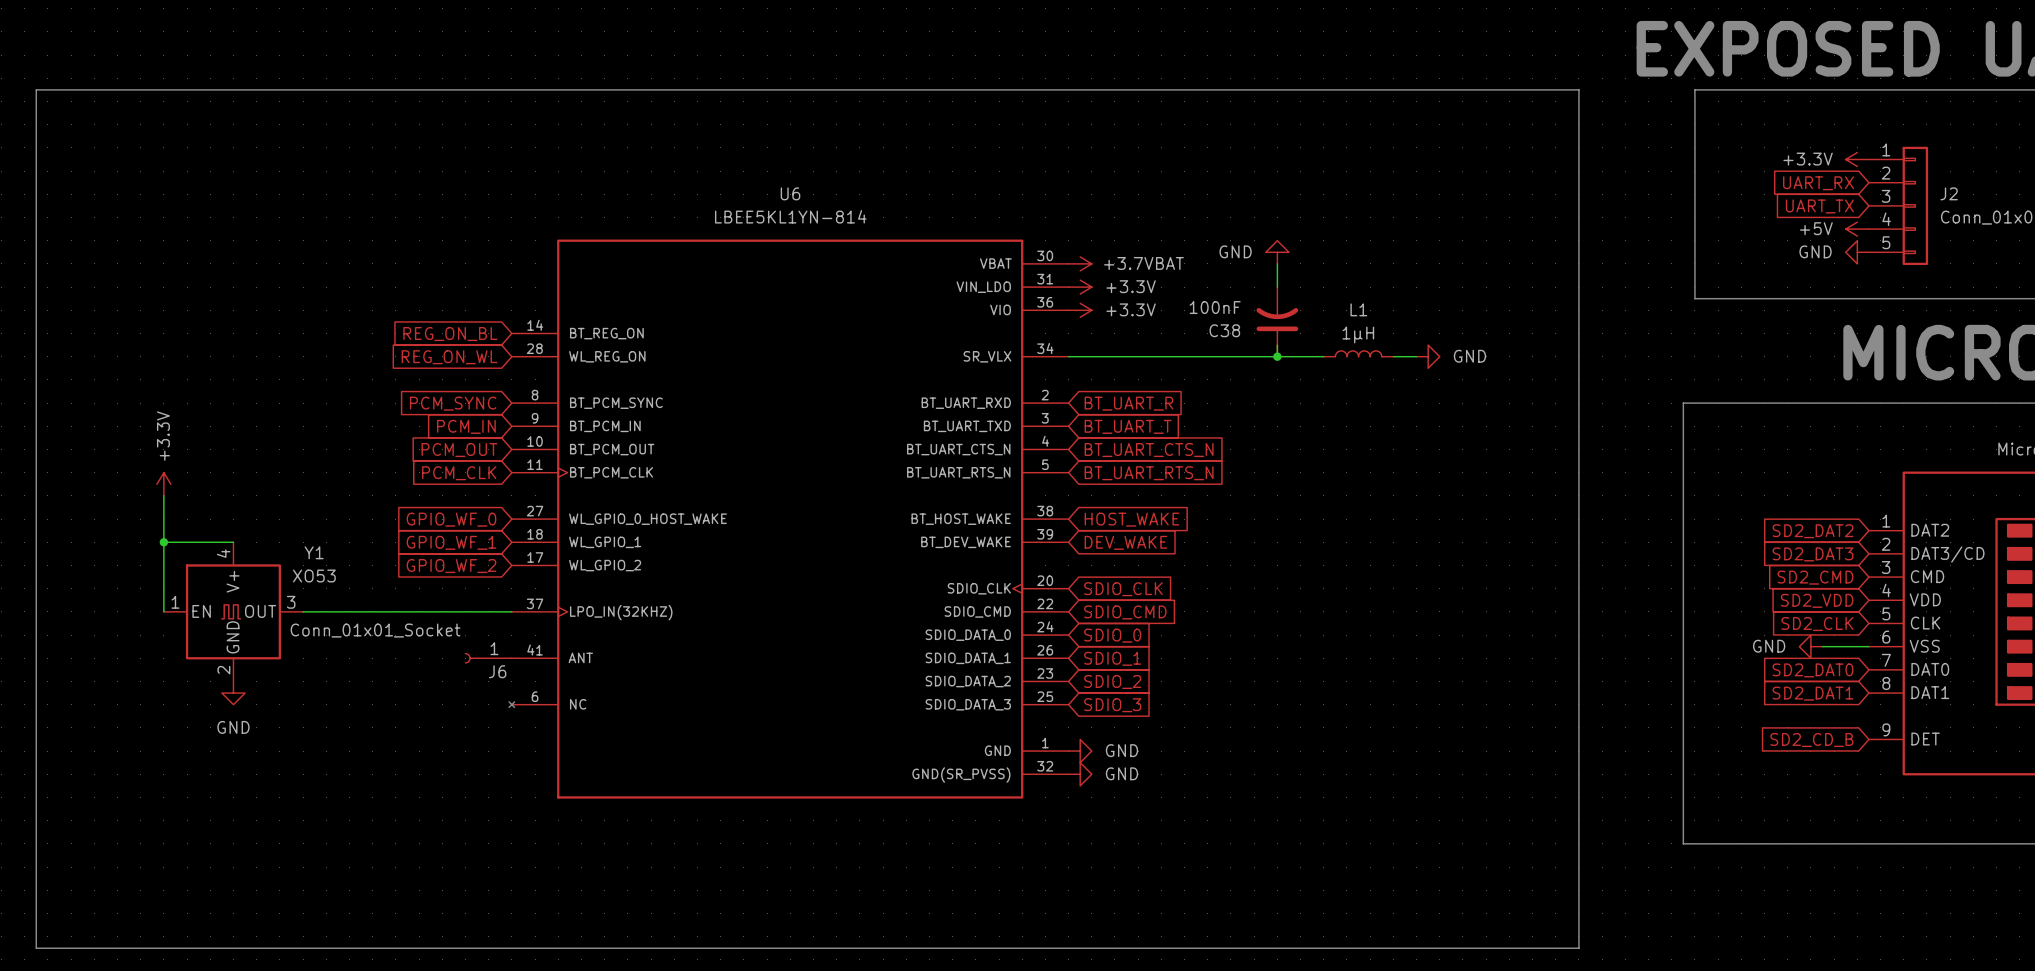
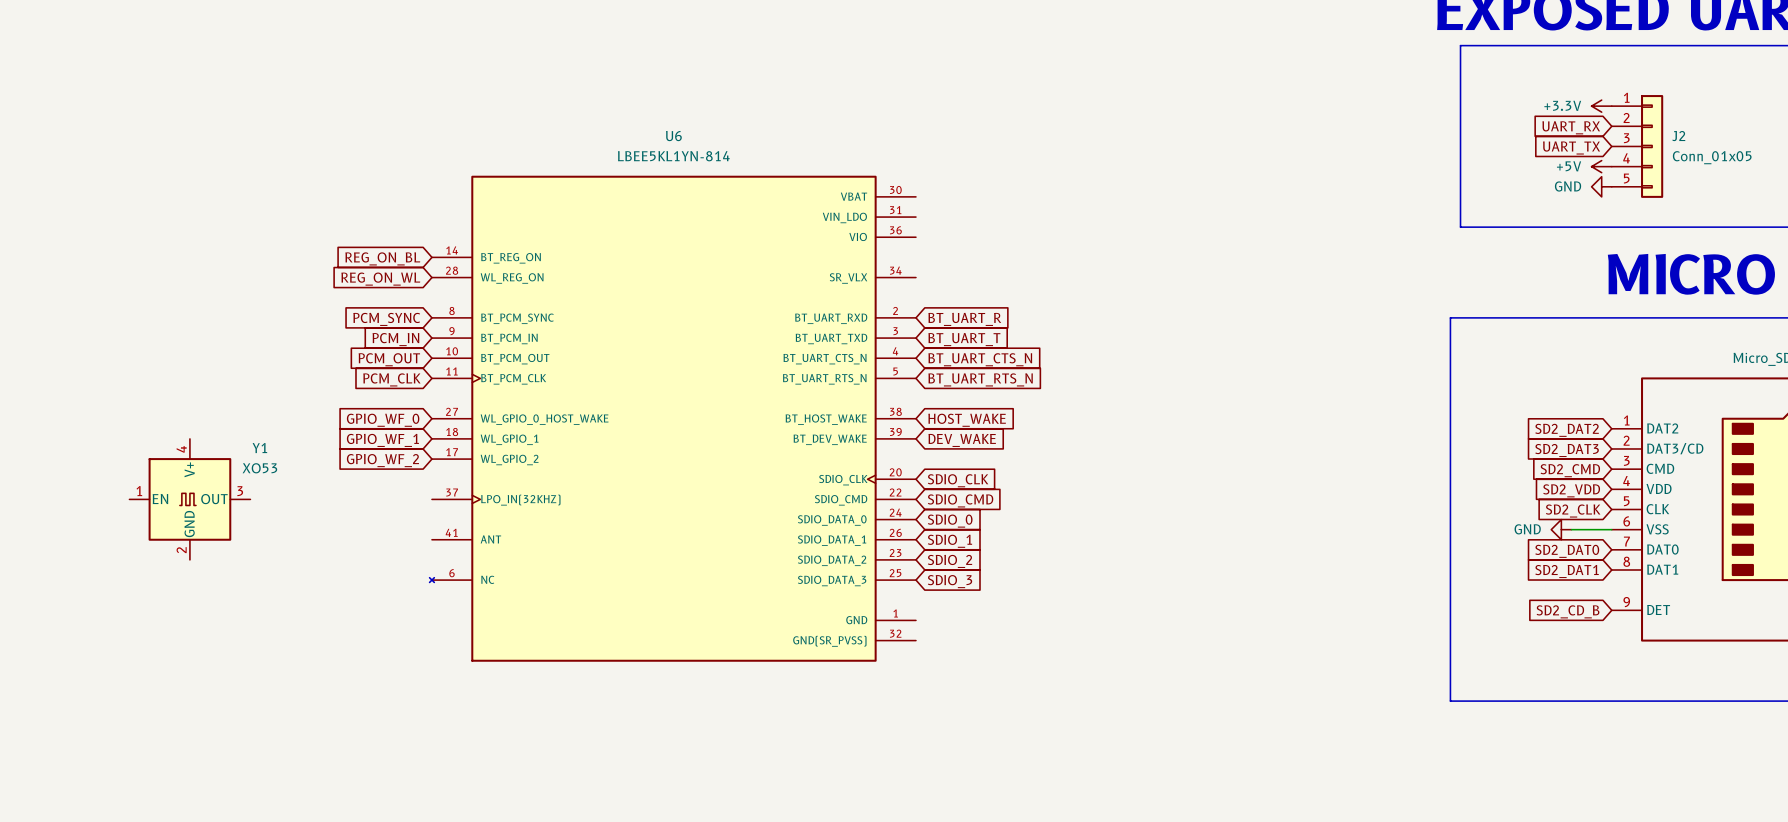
line: (36, 89) (1578, 89) (1578, 948) (36, 948) (36, 89) -> none
power symbol: GND (1277, 252) -> none
power symbol: +3.7VBAT (1080, 263) -> none
wire: (1277, 263) (1277, 287) -> none
power symbol: +3.3V (1080, 287) -> none
power symbol: +3.3V (1080, 310) -> none
C38: 100nF (1277, 321) -> none
wire: (1277, 345) (1277, 356) -> none
L1: 1µH (1358, 353) -> none
wire: (1068, 356) (1323, 356) -> none
junction: (1277, 356) -> none
wire: (1393, 356) (1416, 356) -> none
power symbol: GND (1428, 356) -> none
power symbol: +3.3V (163, 484) -> none
wire: (163, 495) (163, 611) -> none
wire: (163, 542) (233, 542) -> none
junction: (163, 542) -> none
wire: (303, 611) (511, 611) -> none
J6: Conn_01x01_Socket (488, 658) -> none
power symbol: GND (233, 693) -> none
power symbol: GND (1080, 751) -> none
power symbol: GND (1080, 774) -> none

